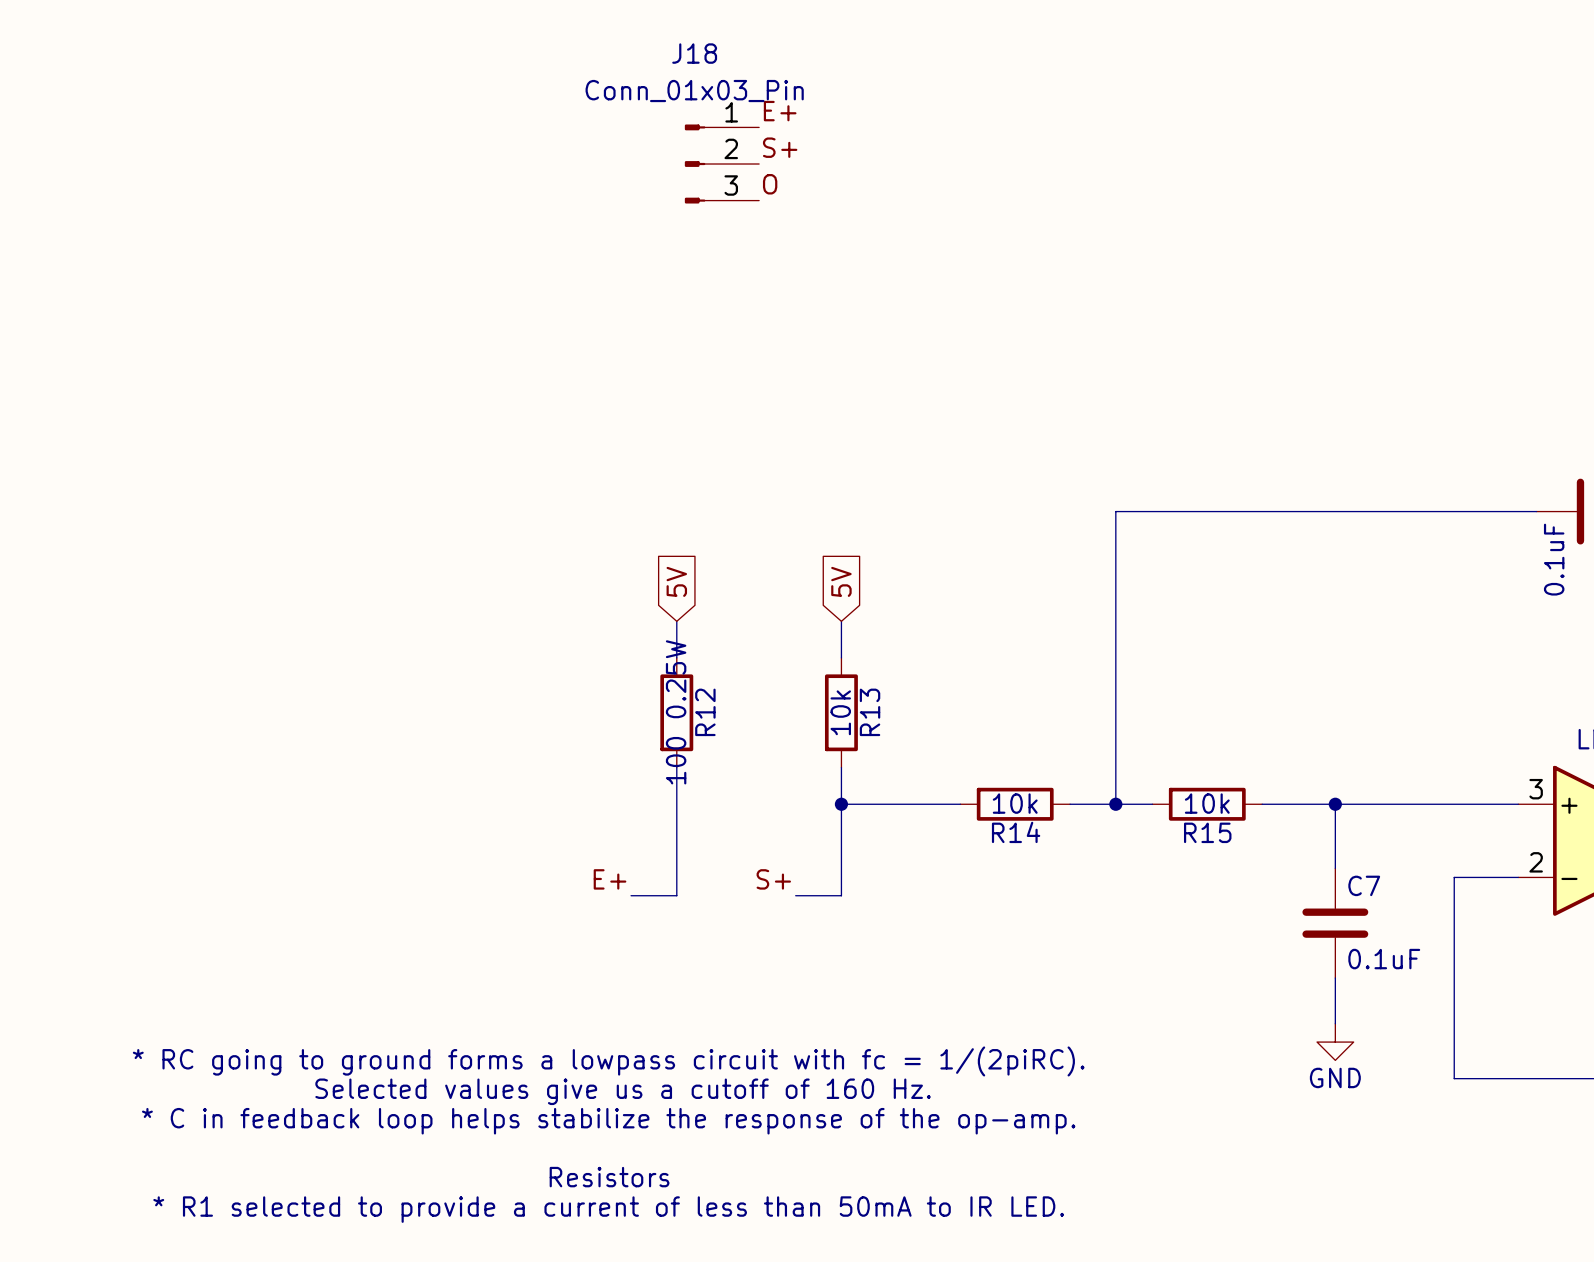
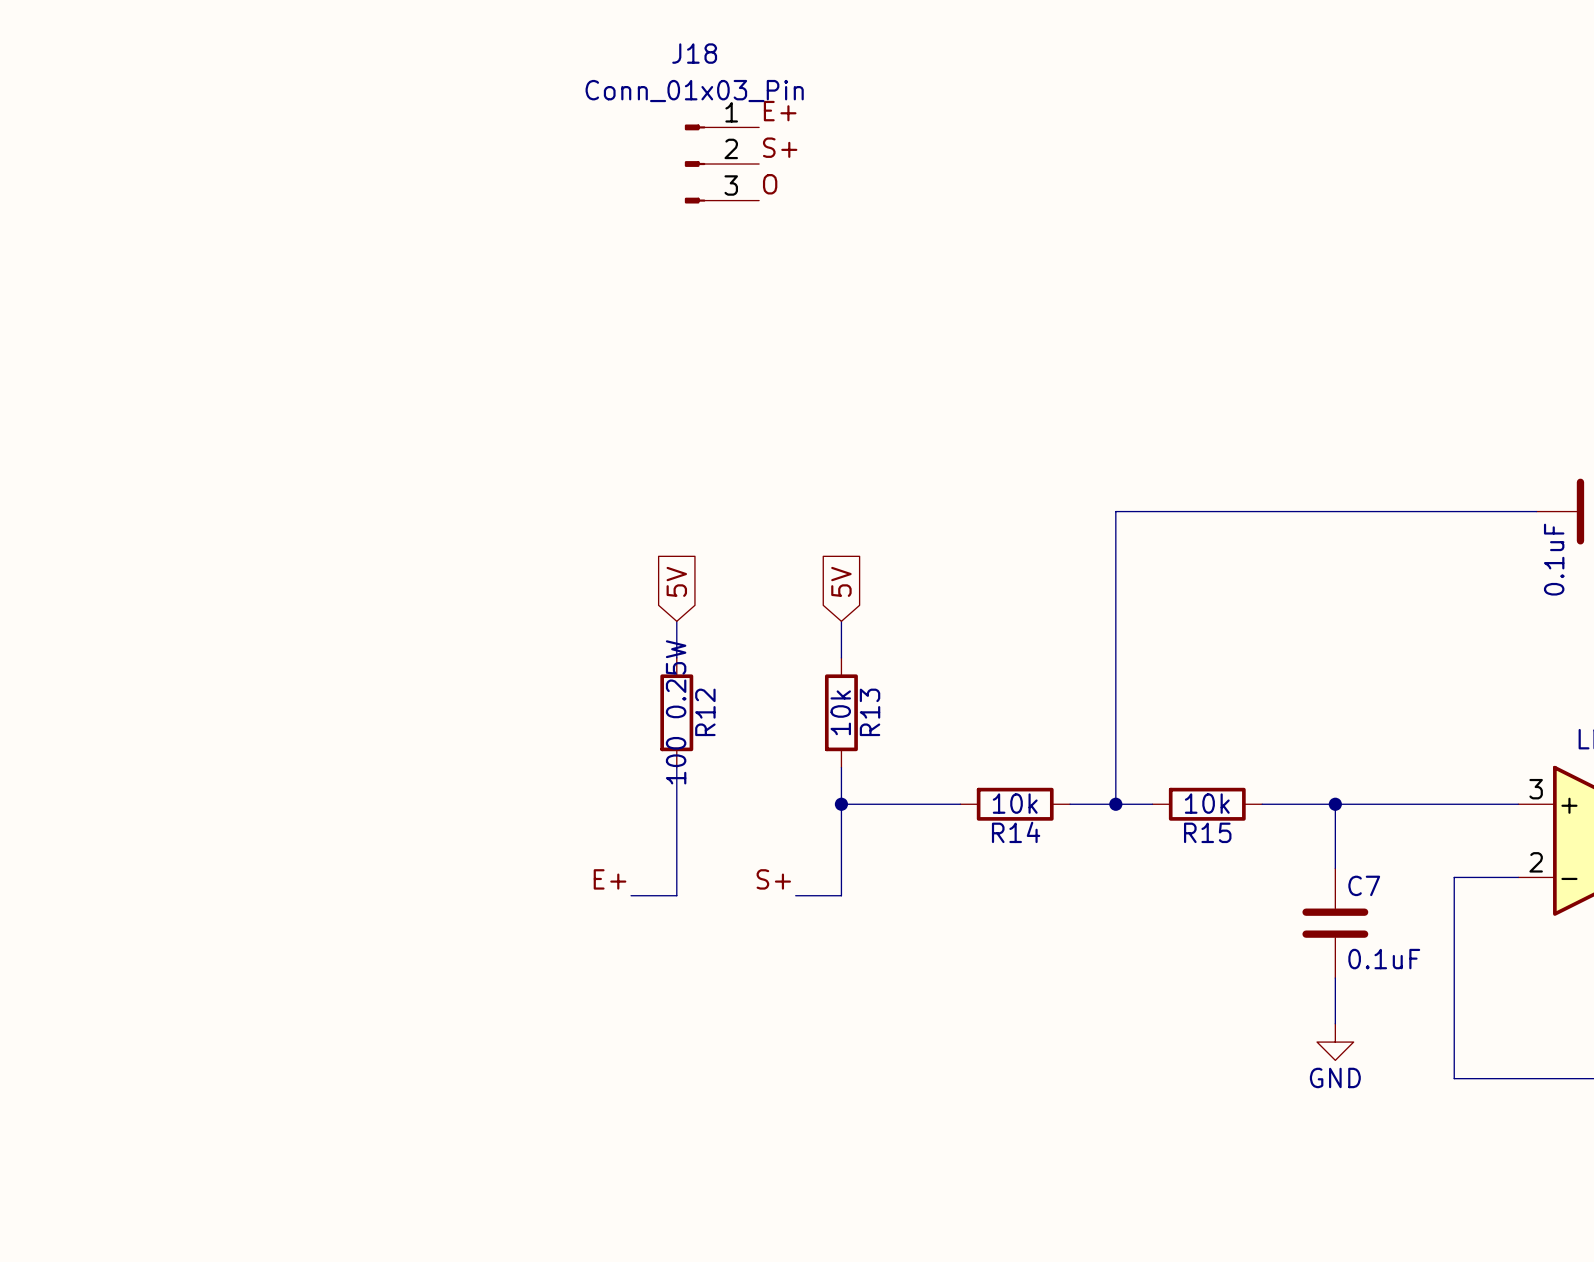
text: * RC going to ground forms a lowpass circuit with fc = 1/(2piRC). (608, 1061) -> none
text: Selected values give us a cutoff of 160 Hz. (623, 1091) -> none
text: * C in feedback loop helps stabilize the response of the op-amp. (608, 1121) -> none
text: Resistors (609, 1177) -> none
text: * R1 selected to provide a current of less than 50mA to IR LED. (608, 1209) -> none

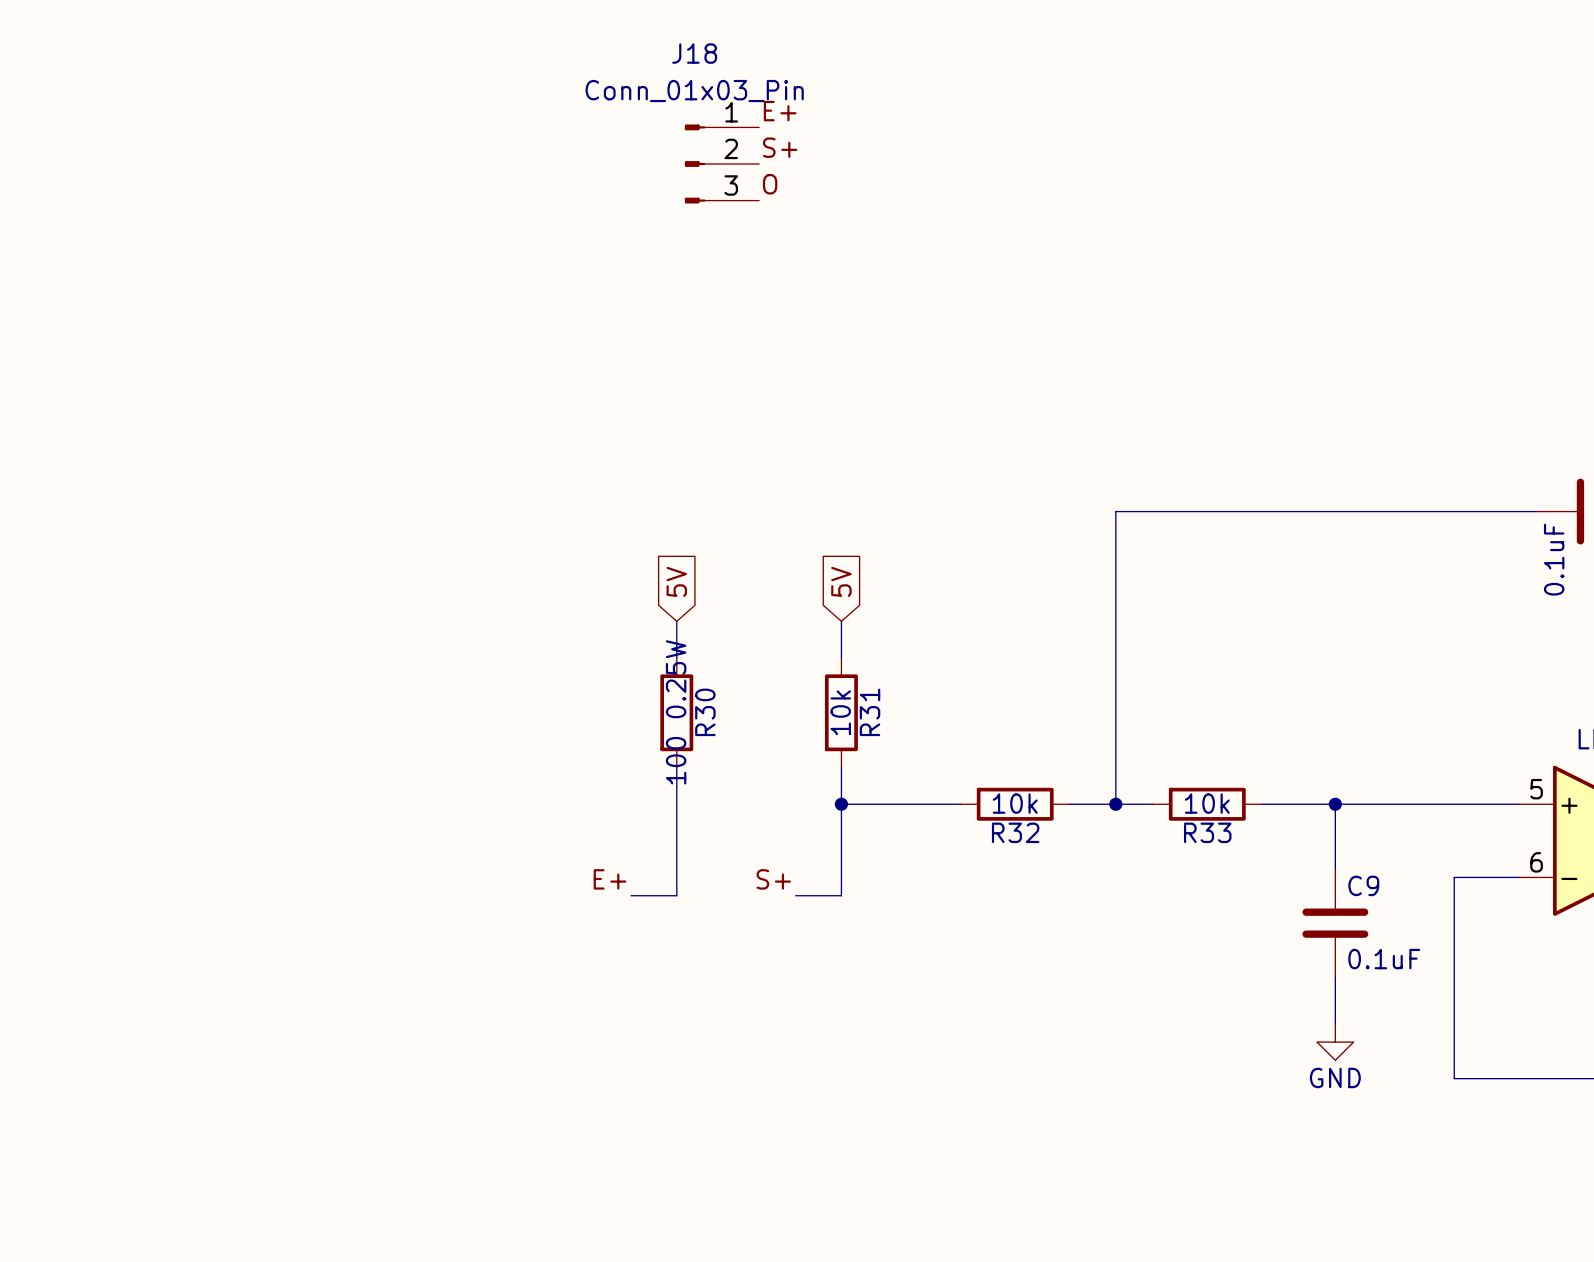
R12 name: R12 (705, 712) -> R30 (705, 712)
R13 name: R13 (870, 712) -> R31 (870, 712)
part pin number: 3 (1536, 789) -> 5 (1536, 789)
R14 name: R14 (1016, 832) -> R32 (1015, 832)
R15 name: R15 (1207, 832) -> R33 (1207, 832)
part pin number: 2 (1536, 862) -> 6 (1536, 862)
C7 name: C7 (1364, 885) -> C9 (1363, 885)

